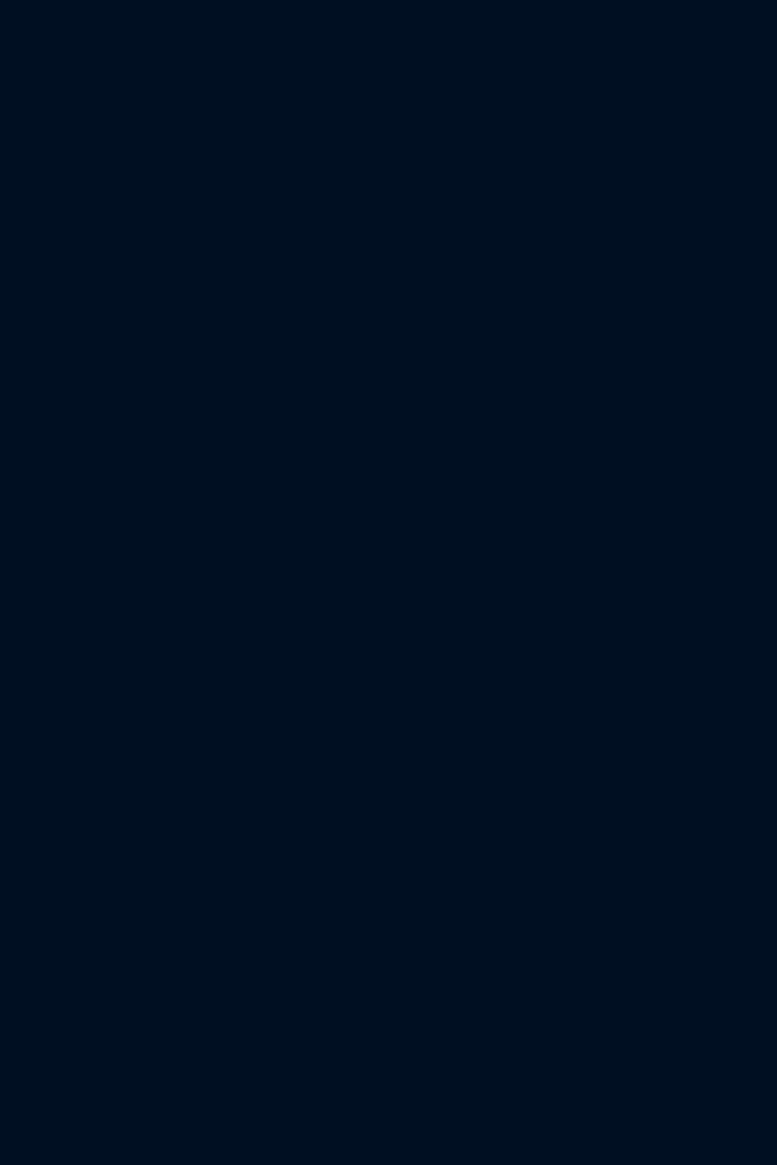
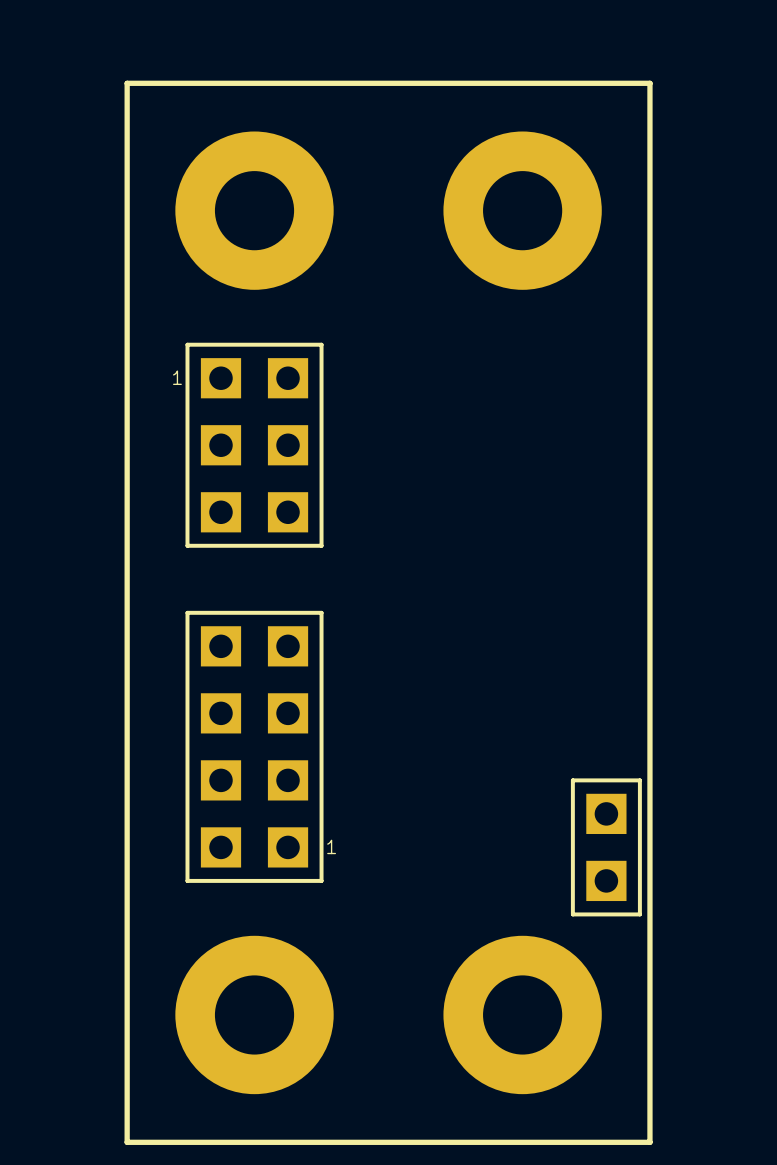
line: none -> (127, 83) (649, 83) (649, 1142) (127, 1142) (127, 83)
part: none -> (254, 210)
part: none -> (522, 210)
part: none -> (254, 445)
part: none -> (254, 746)
part: none -> (606, 847)
part: none -> (254, 1014)
part: none -> (522, 1014)

